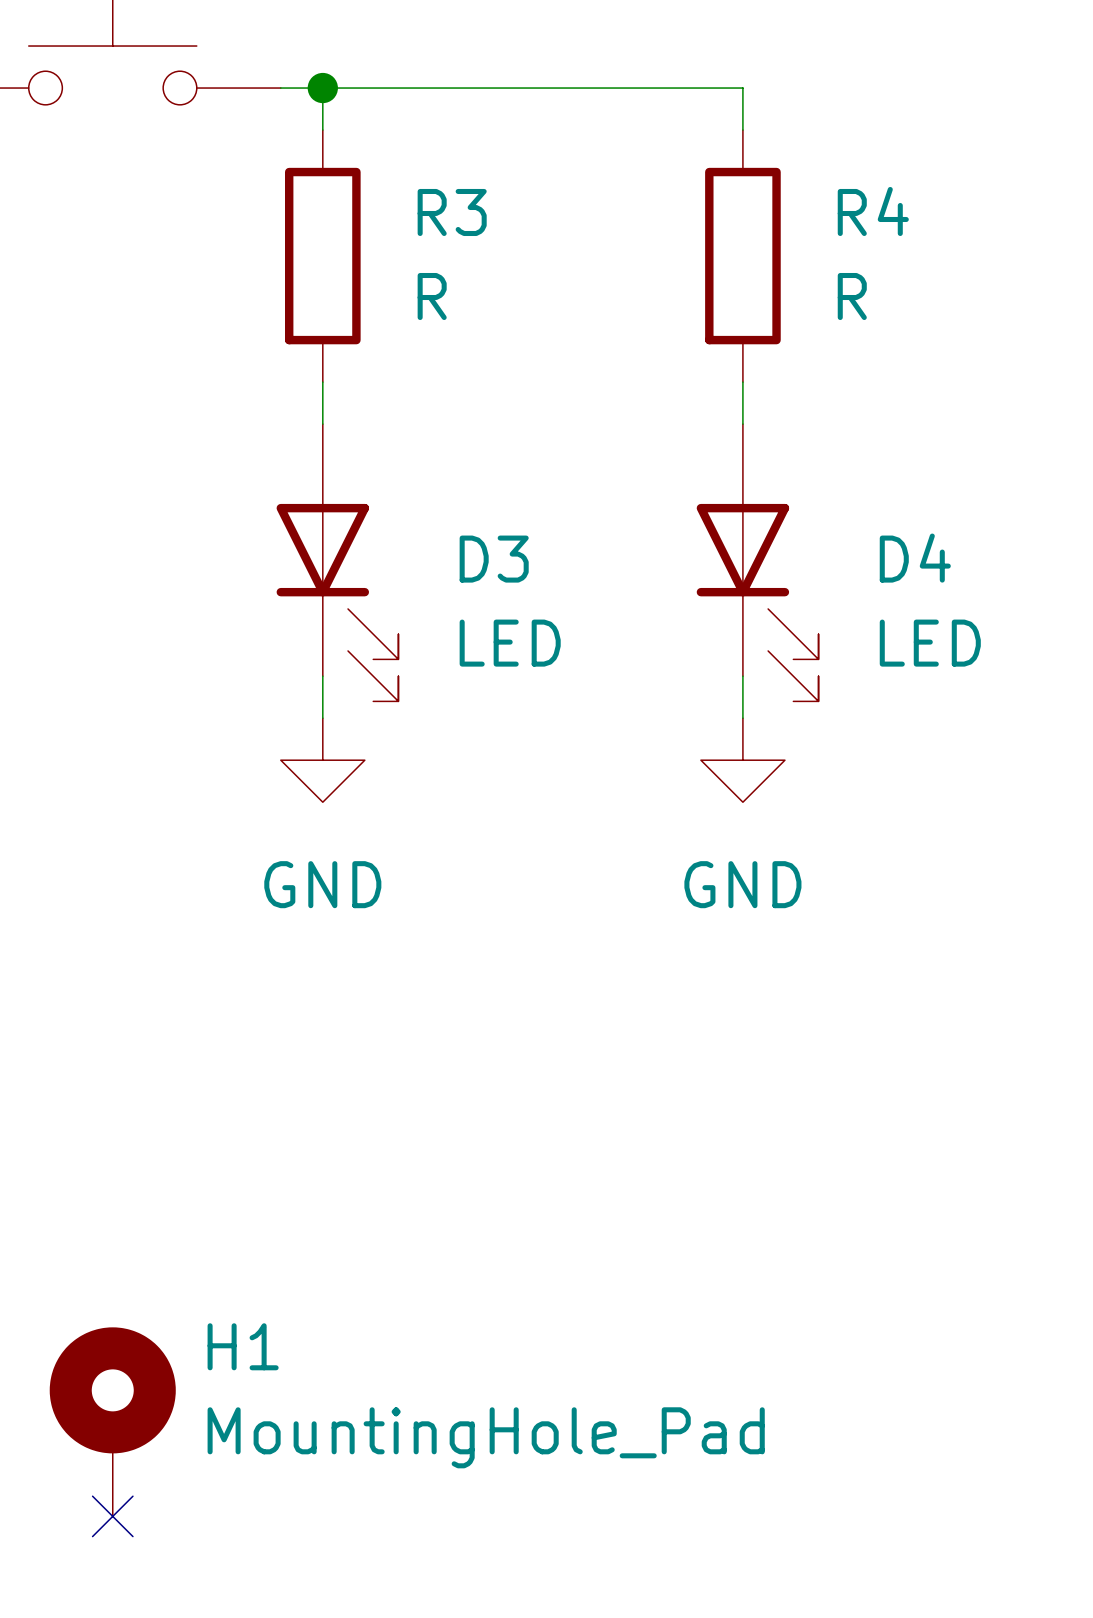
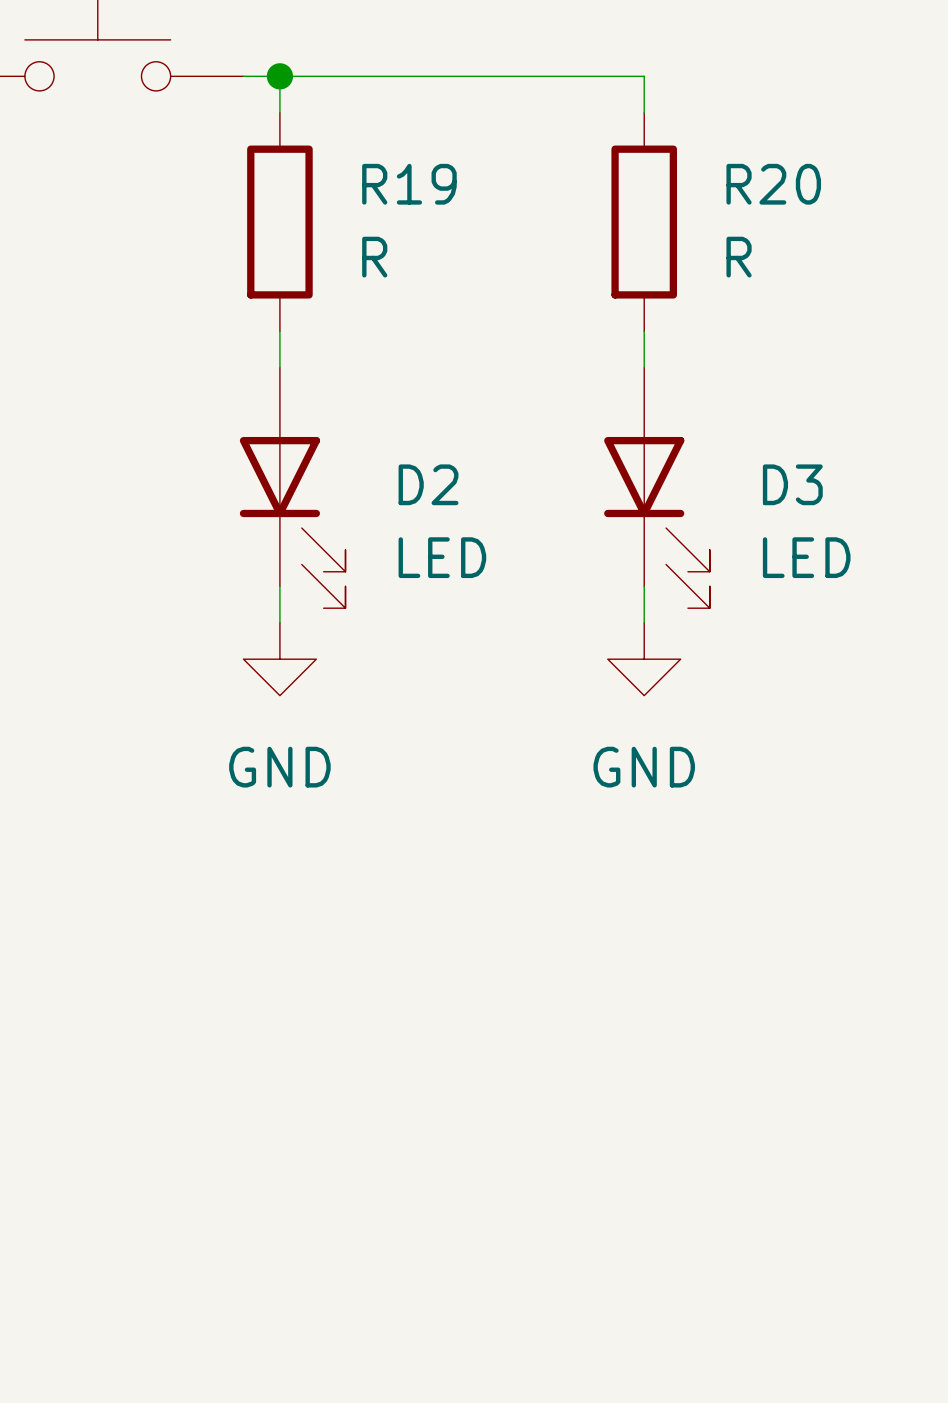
R4 name: R4 (873, 211) -> R20 (773, 184)
R3 name: R3 (452, 212) -> R19 (409, 184)
D4 name: D4 (915, 558) -> D3 (792, 484)
D3 name: D3 (494, 559) -> D2 (428, 484)
H1: MountingHole_Pad (112, 1421) -> none
no-connect mark: (112, 1516) -> none

